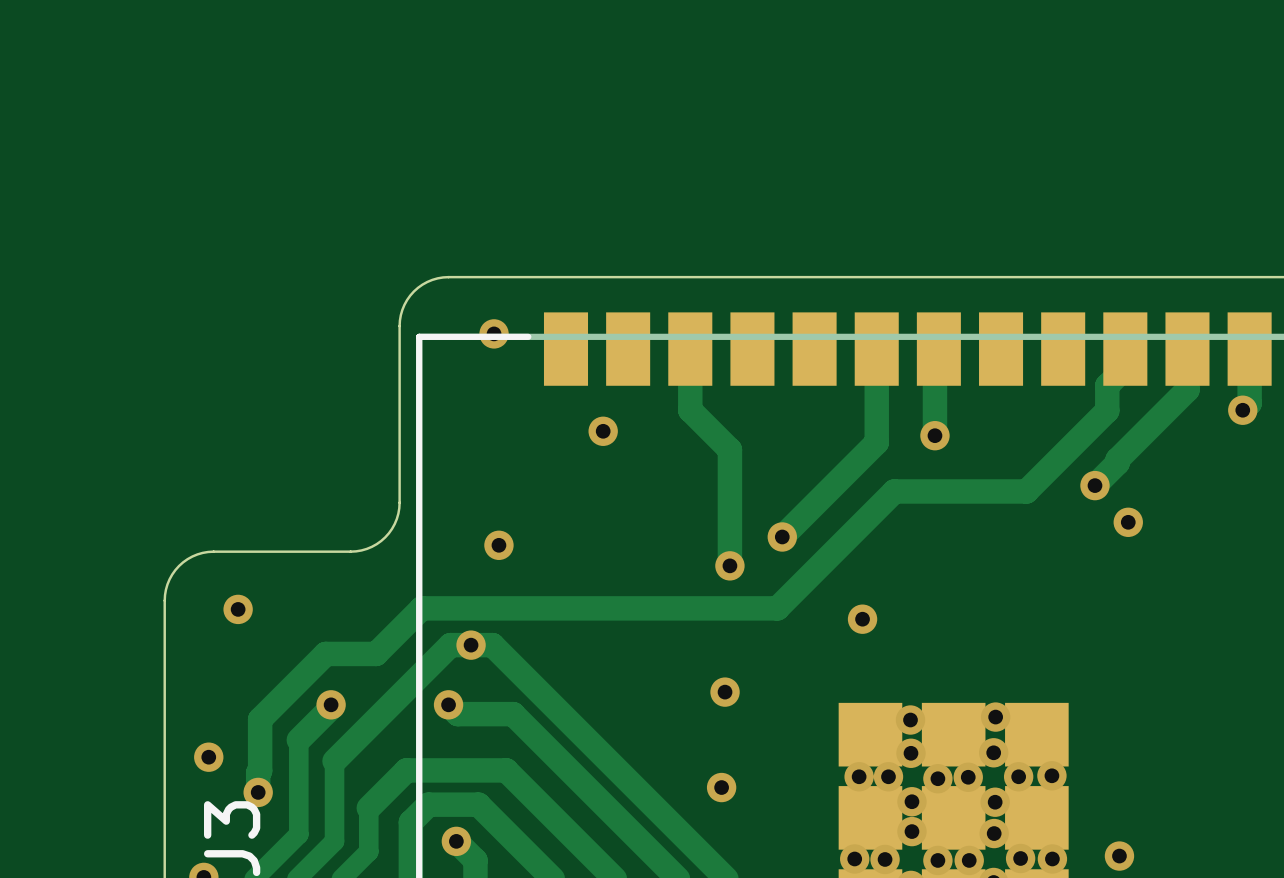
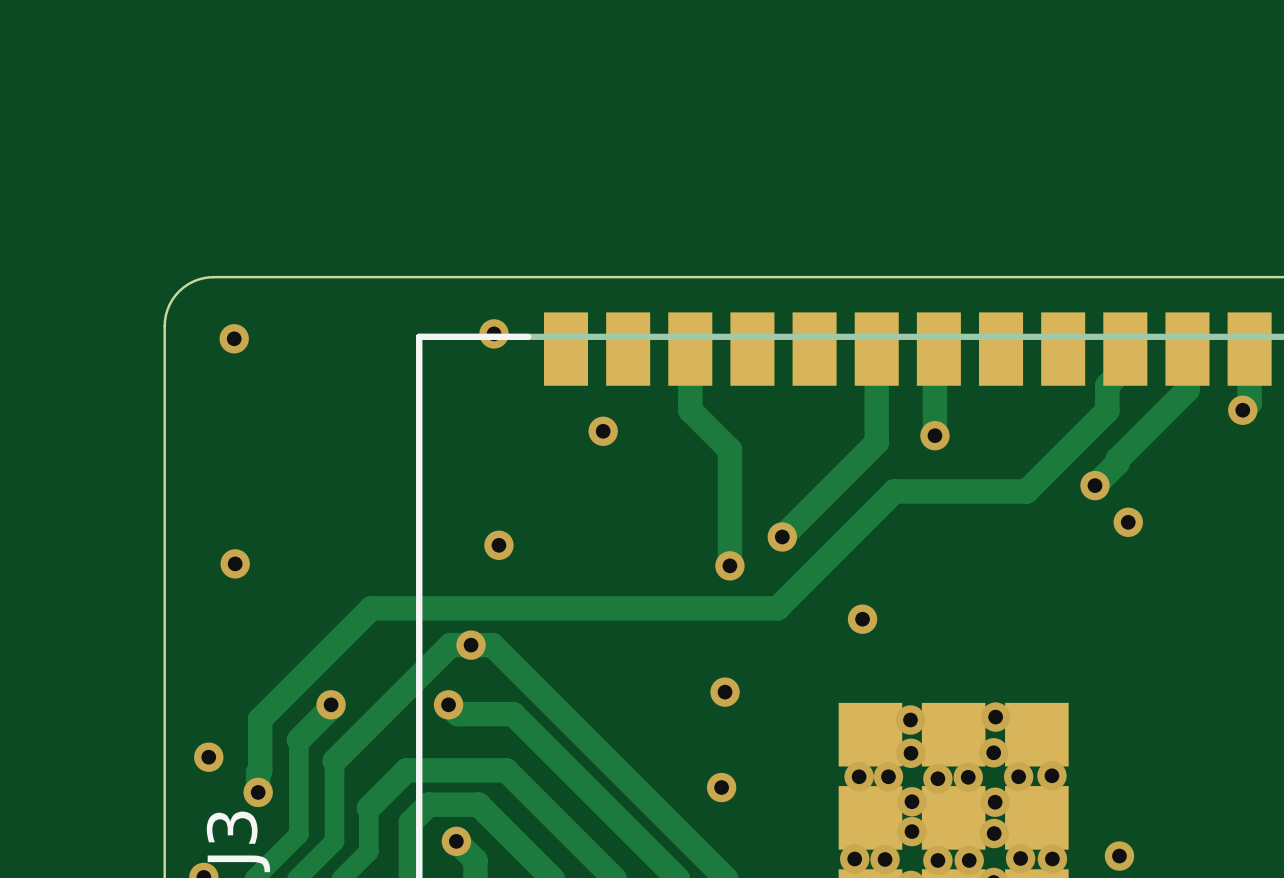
board edge: (448, 277) (432, 279) (418, 287) (407, 300) (400, 315) (399, 502) (396, 518) (388, 533) (371, 546) (356, 551) (213, 551) (197, 554) (183, 562) (172, 574) (167, 584) (164, 600) -> (448, 277) (208, 277) (187, 284) (175, 295) (167, 309) (164, 326) (164, 600)
via: none -> (234, 338)
track: (421, 608) (376, 653) (325, 653) -> (421, 608) (371, 608) (325, 653)
via position: (238, 609) -> (235, 563)

